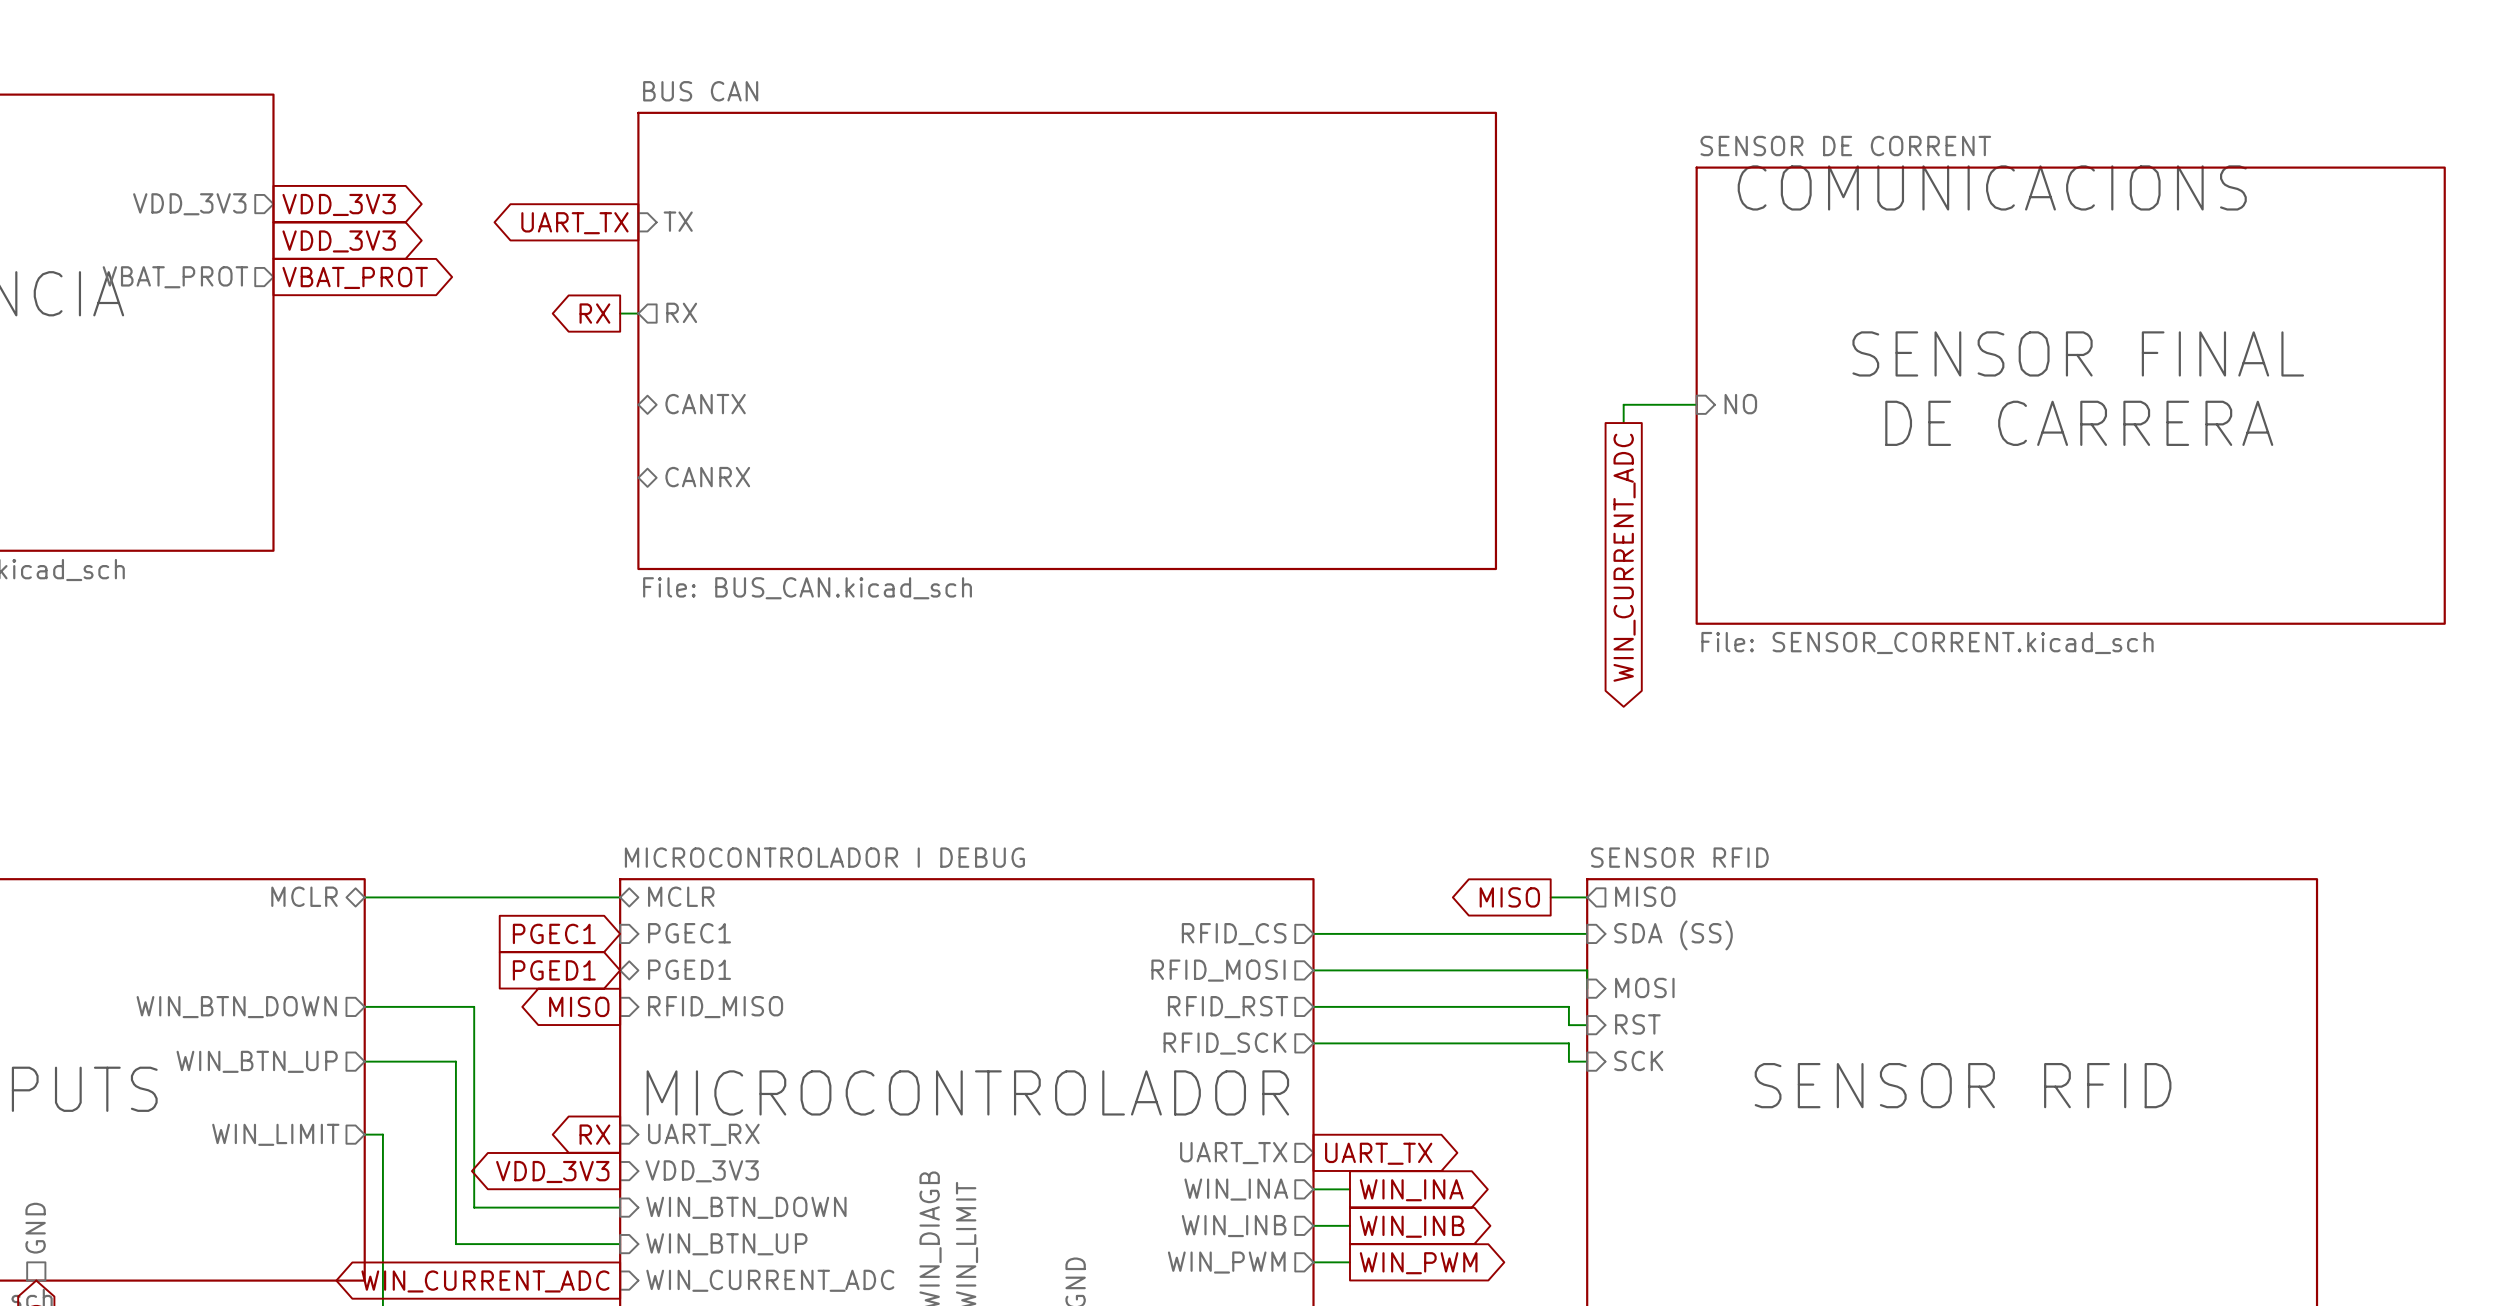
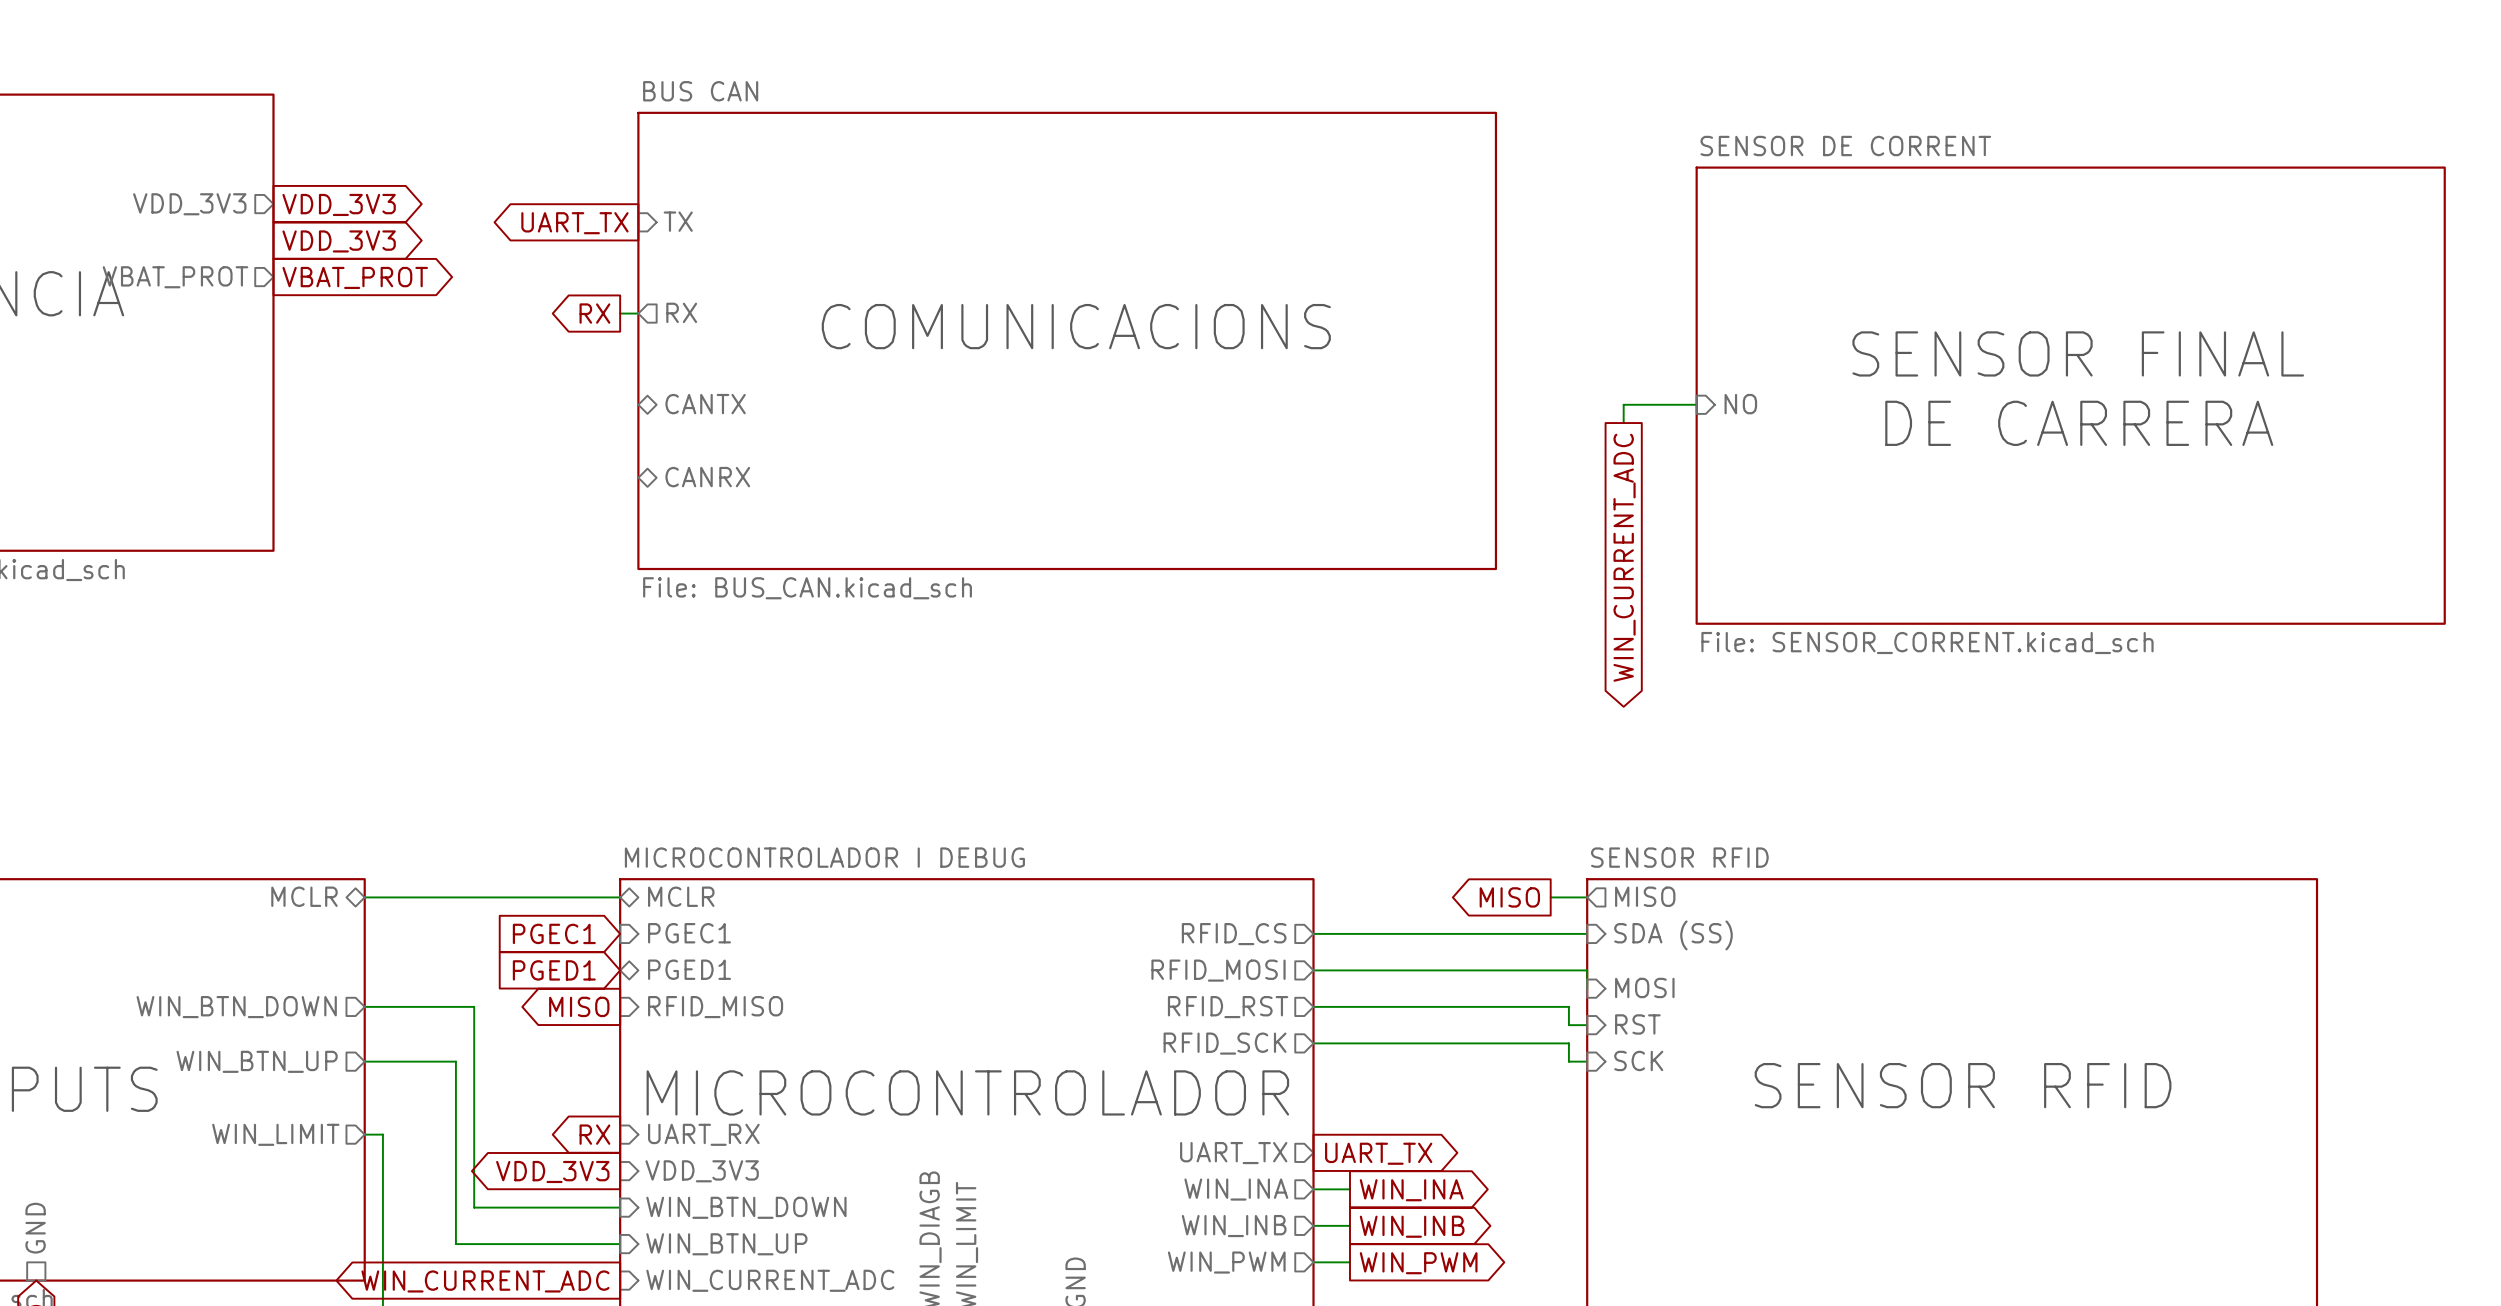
text: COMUNICACIONS (1992, 187) -> none
text: none -> COMUNICACIONS (1076, 326)

